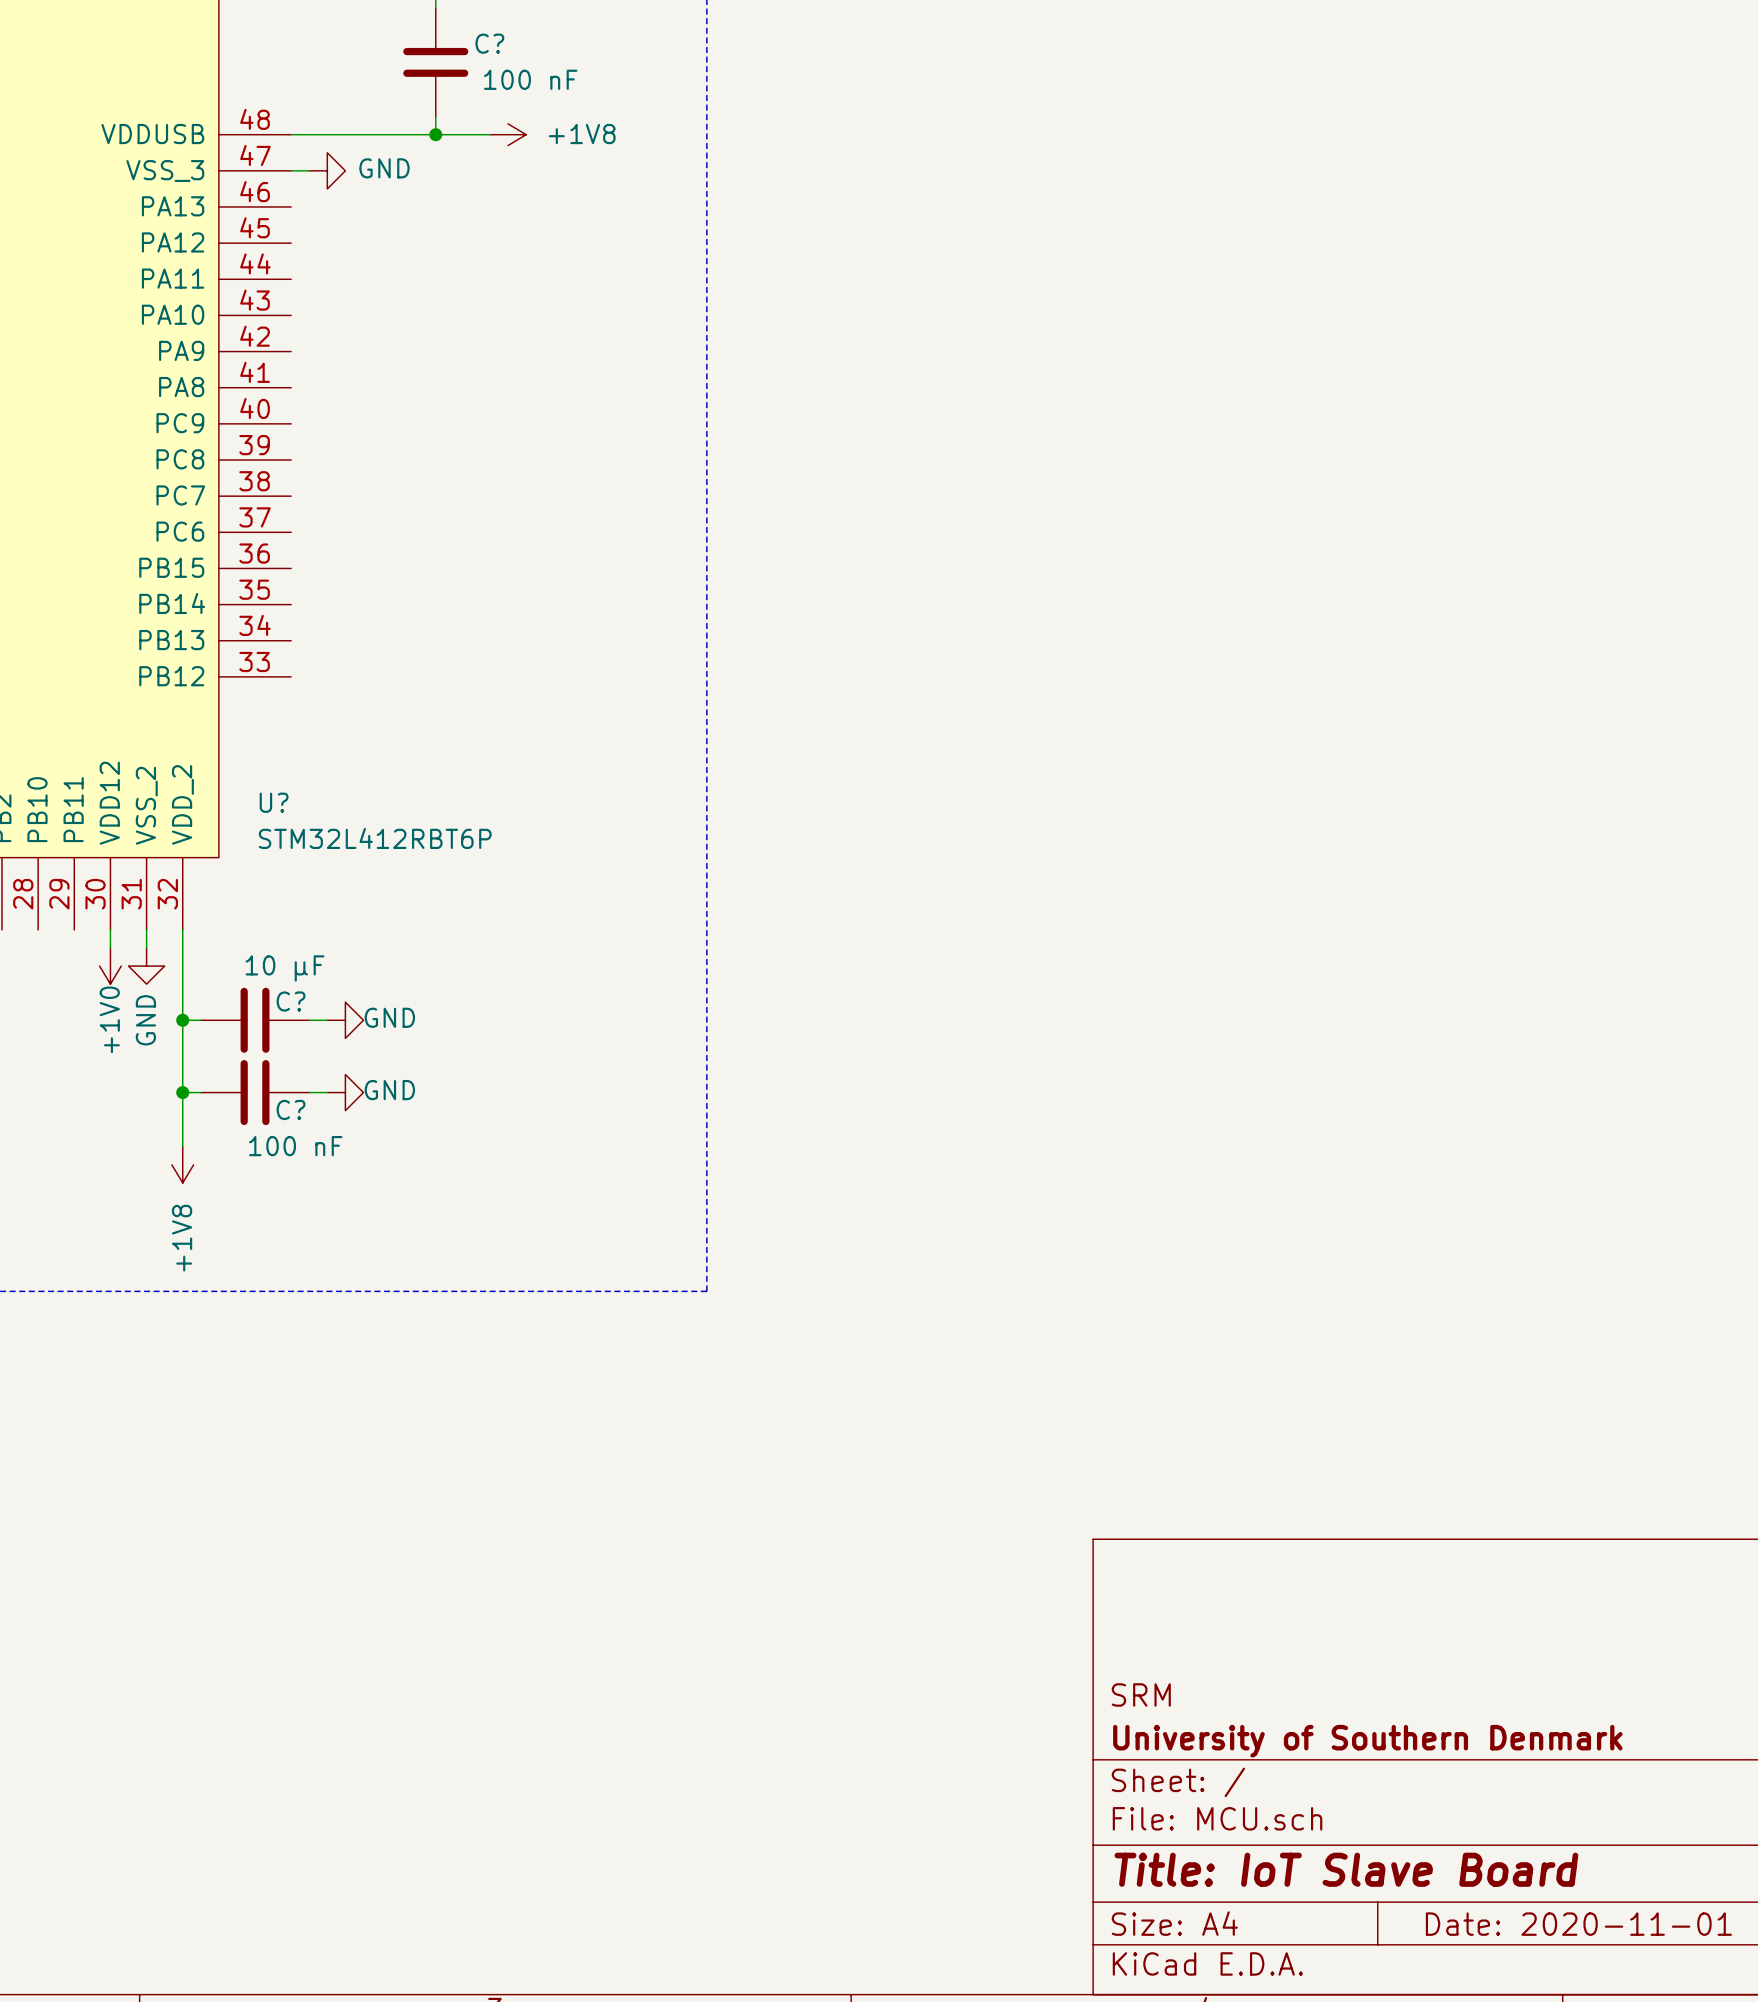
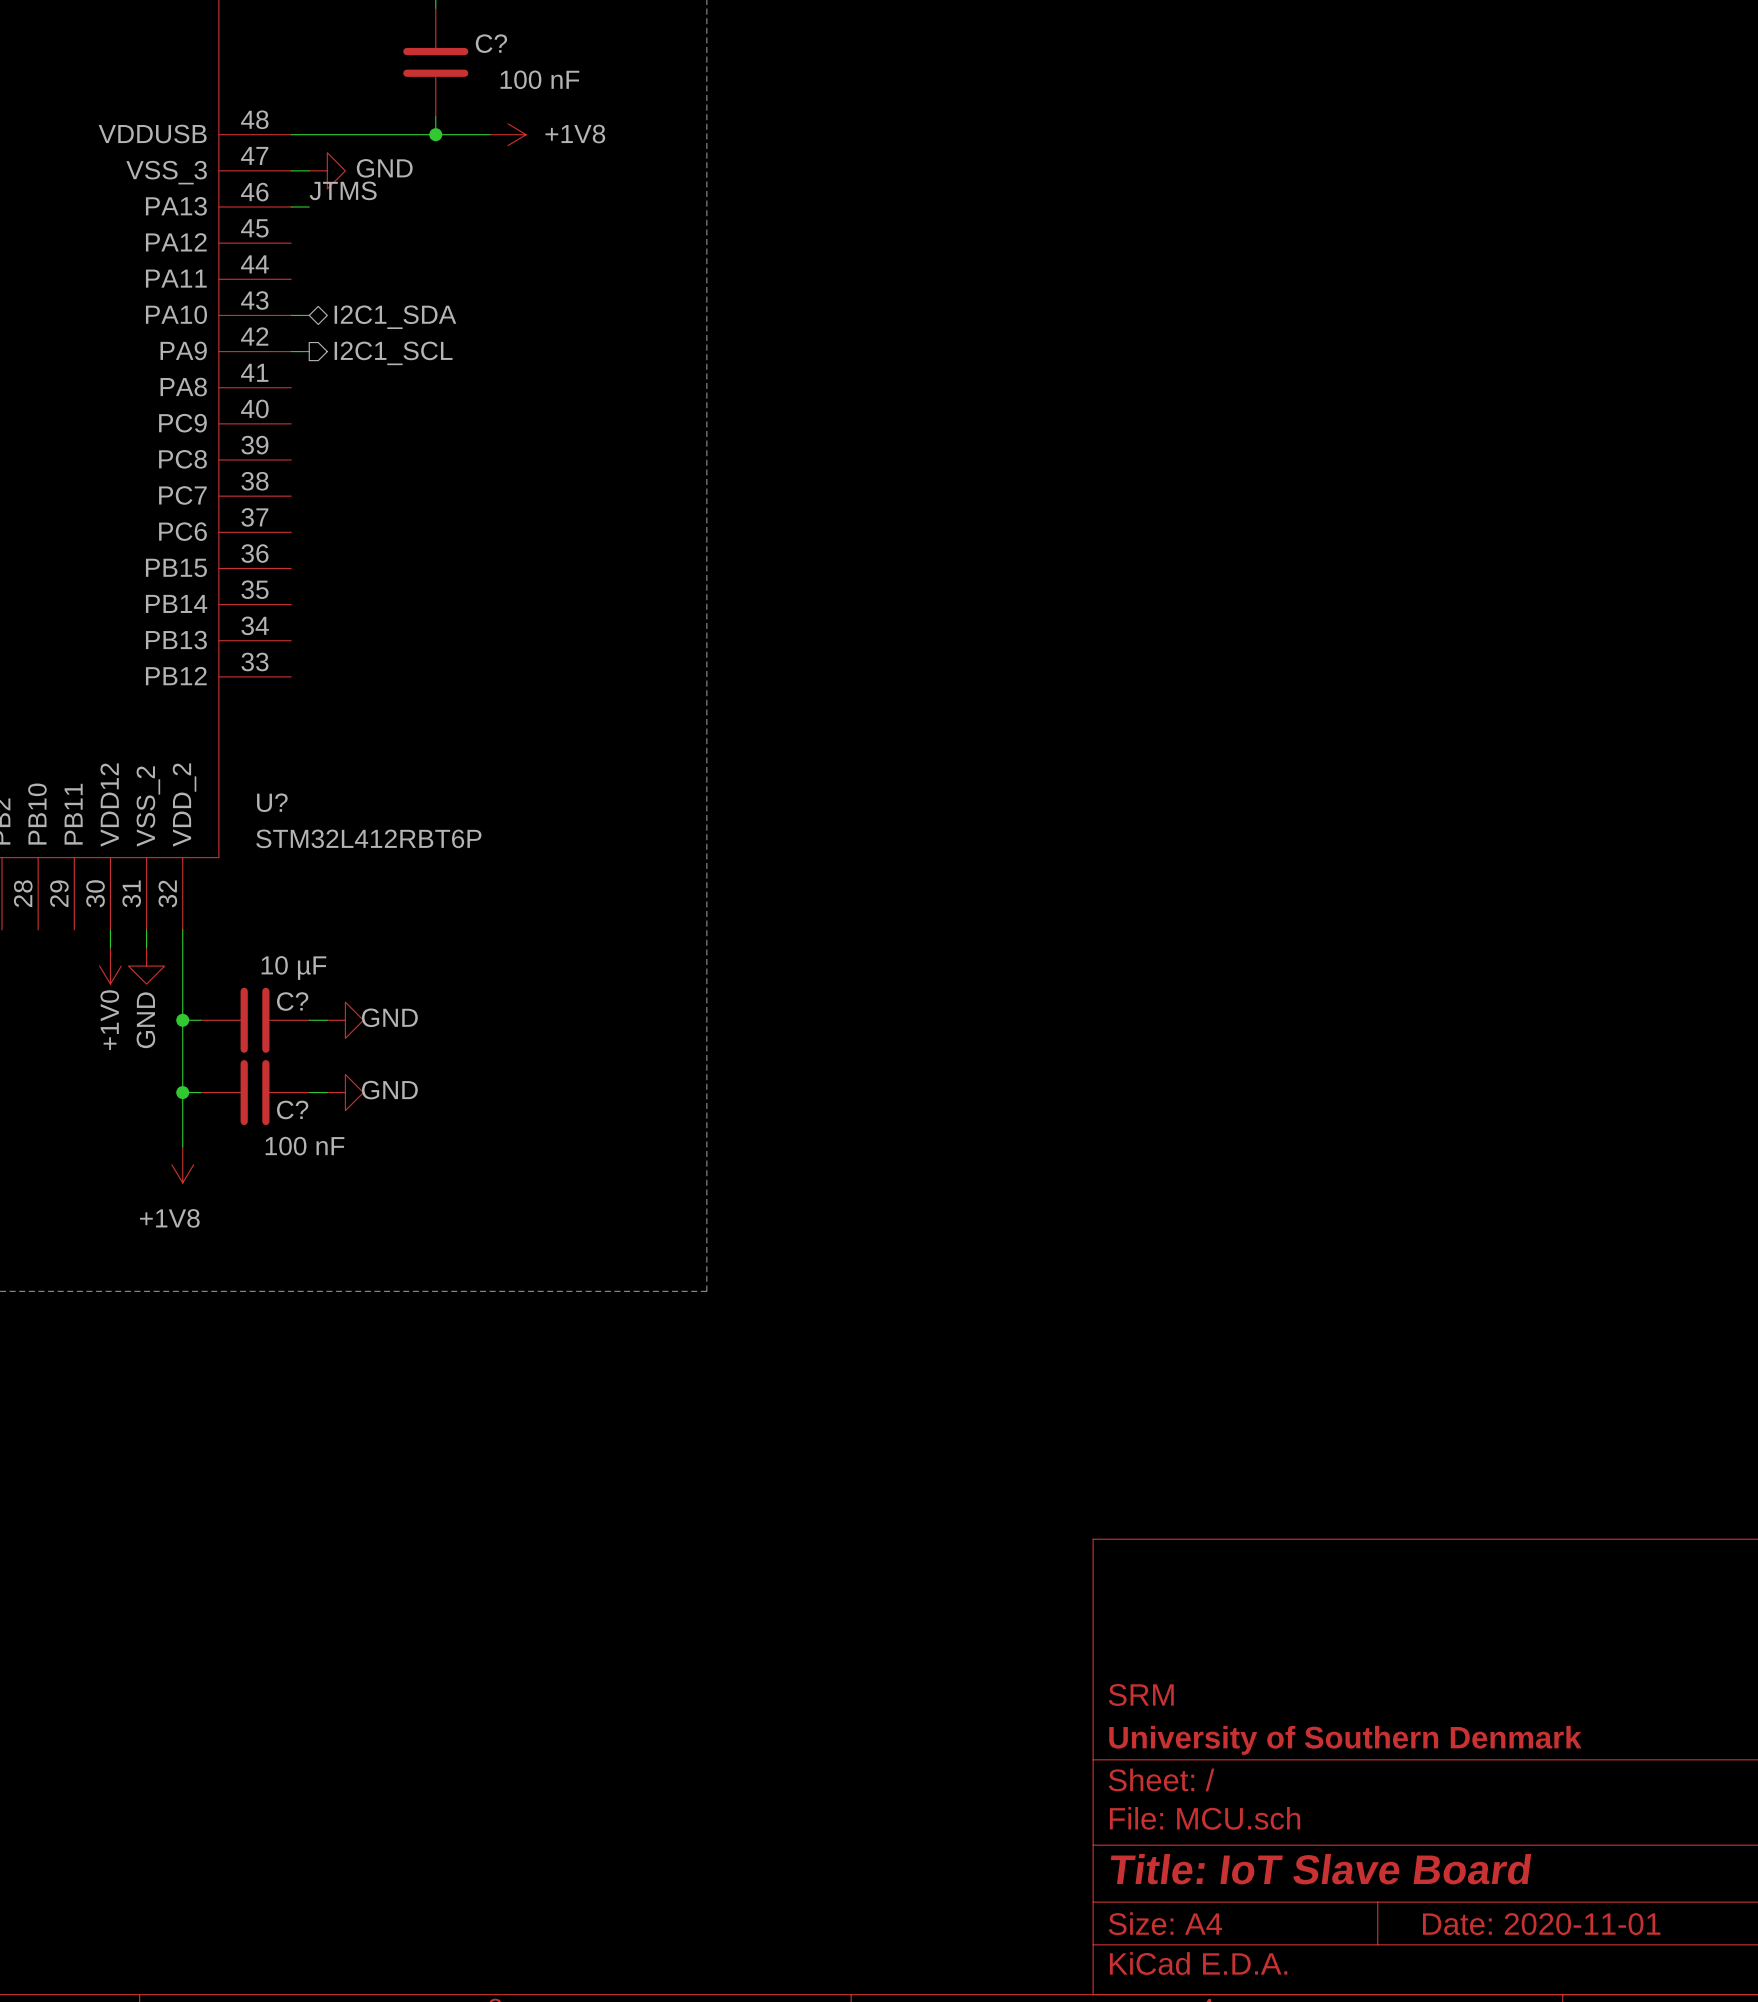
label: none -> JTMS (343, 190)
wire: none -> (291, 206) (309, 206)
wire: none -> (291, 315) (309, 315)
hierarchical label: none -> I2C1_SDA (395, 317)
wire: none -> (291, 351) (309, 351)
hierarchical label: none -> I2C1_SCL (393, 353)
power symbol text rotation: 0° (182, 1238) -> 90° clockwise (169, 1218)

